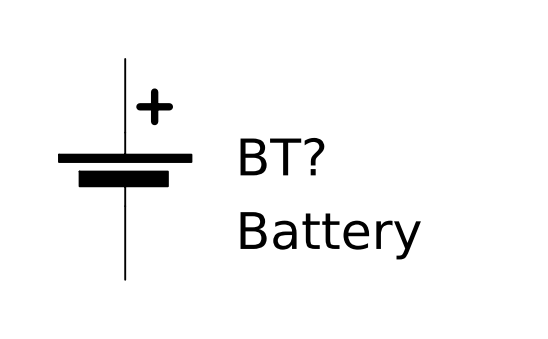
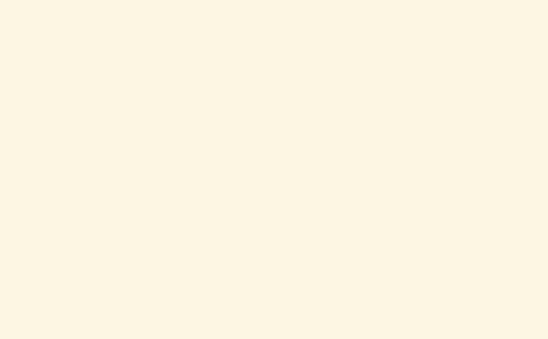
BT?: Battery (125, 169) -> none

